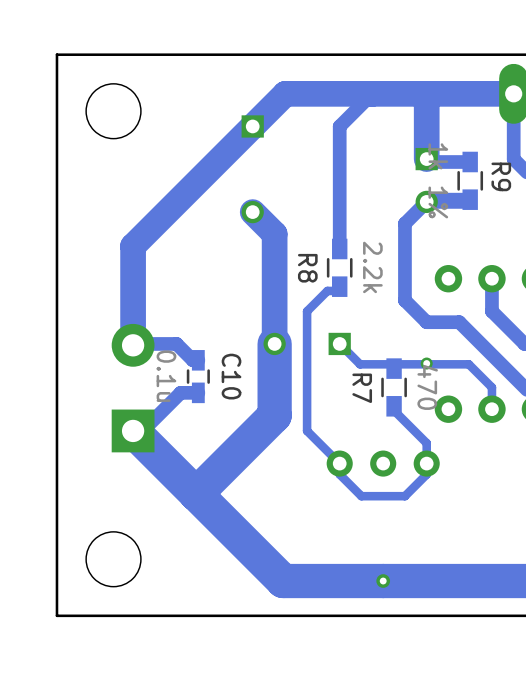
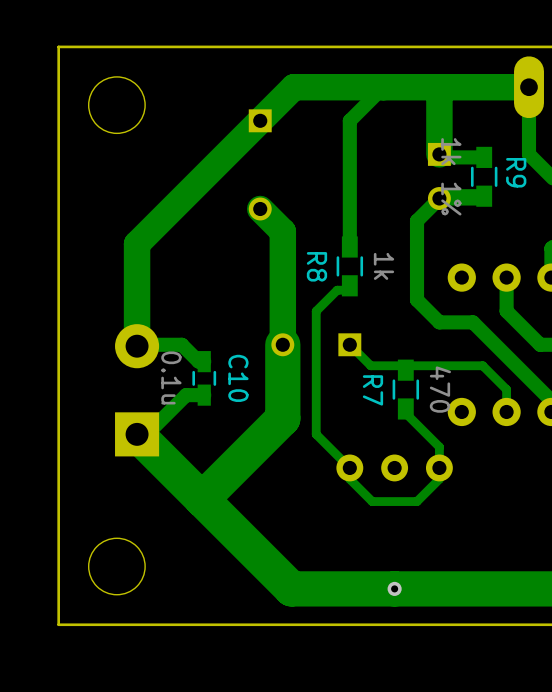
R8 value: 2.2k (372, 267) -> 1k (383, 266)
via: (426, 363) -> none

